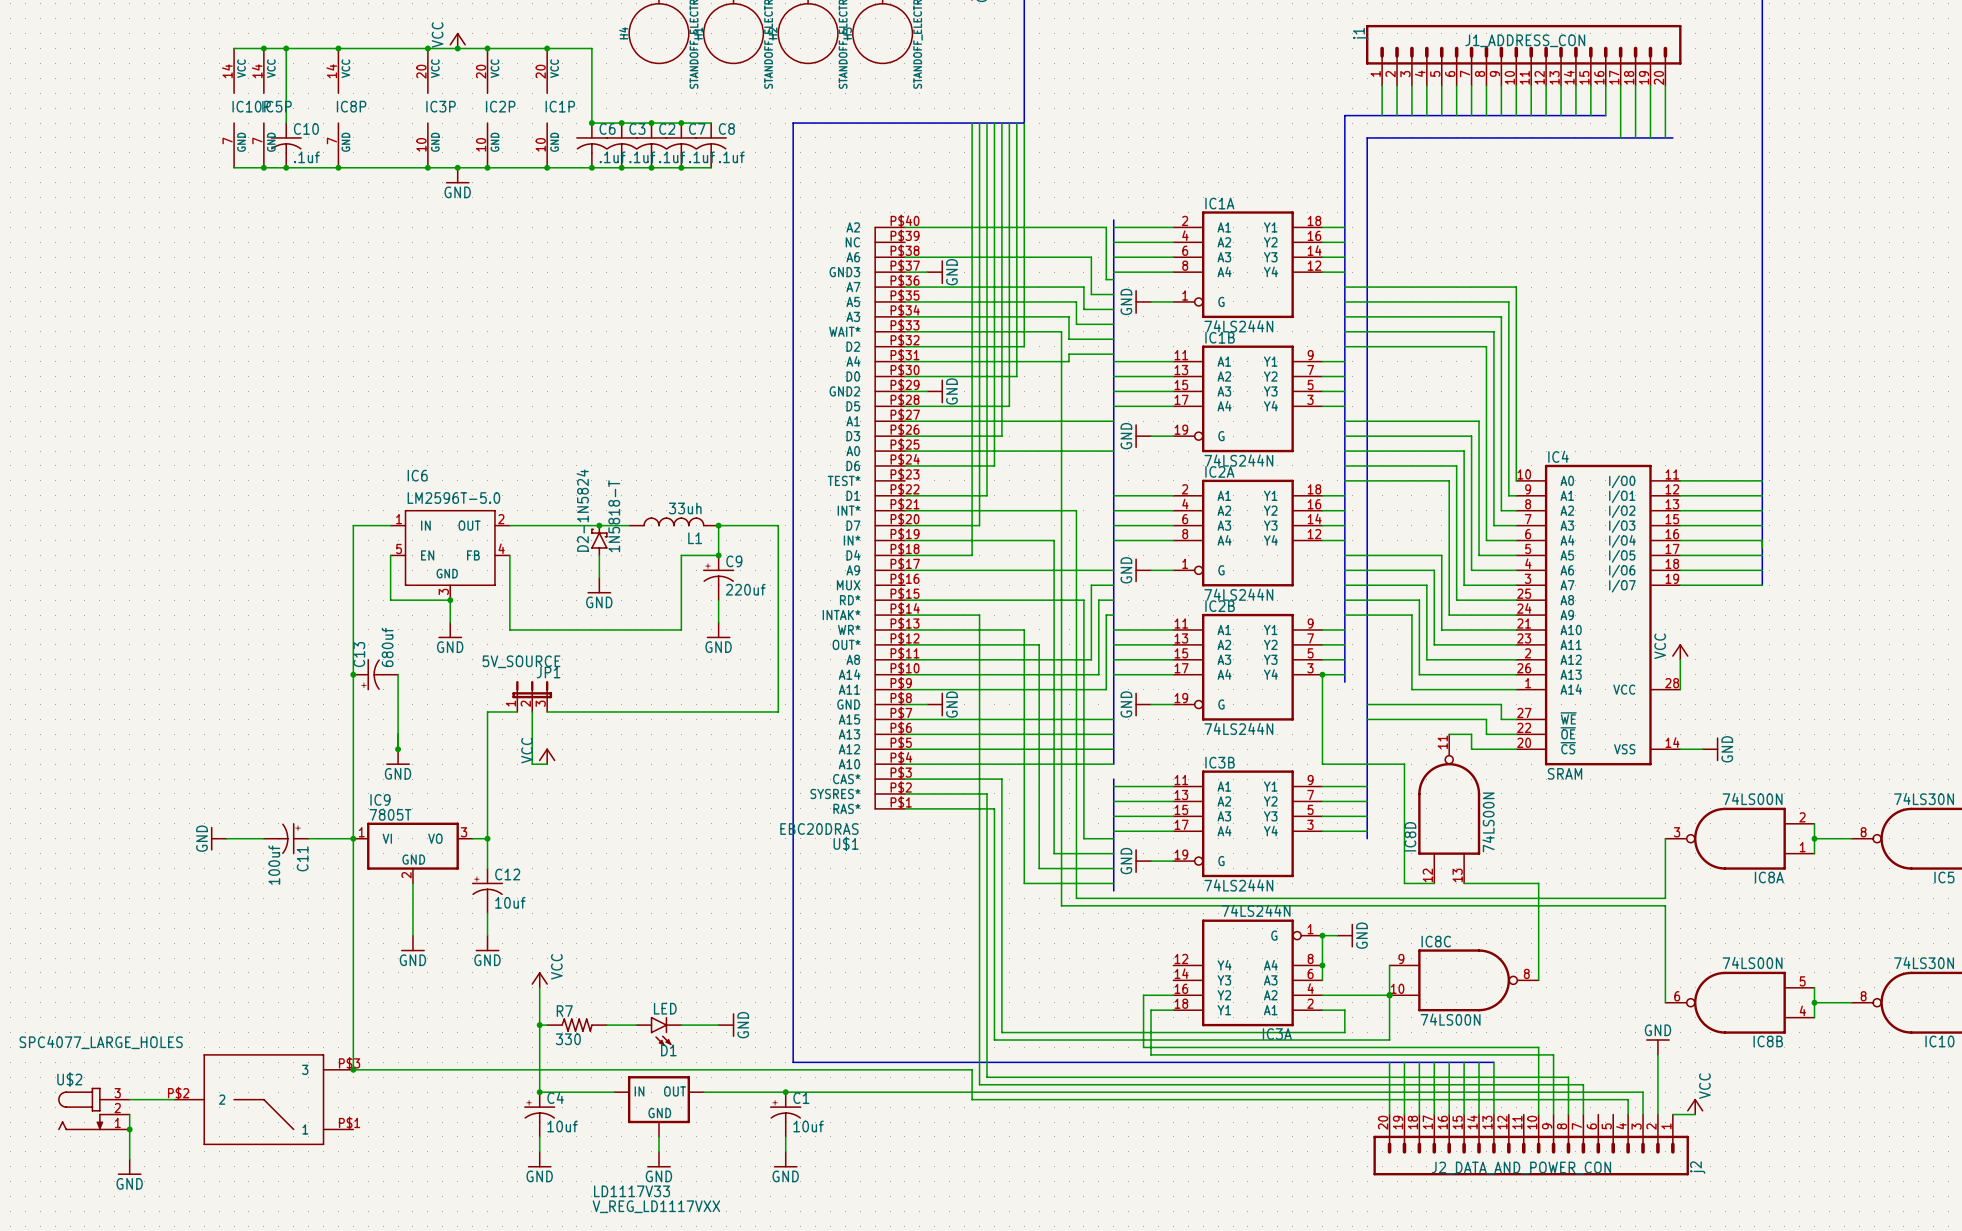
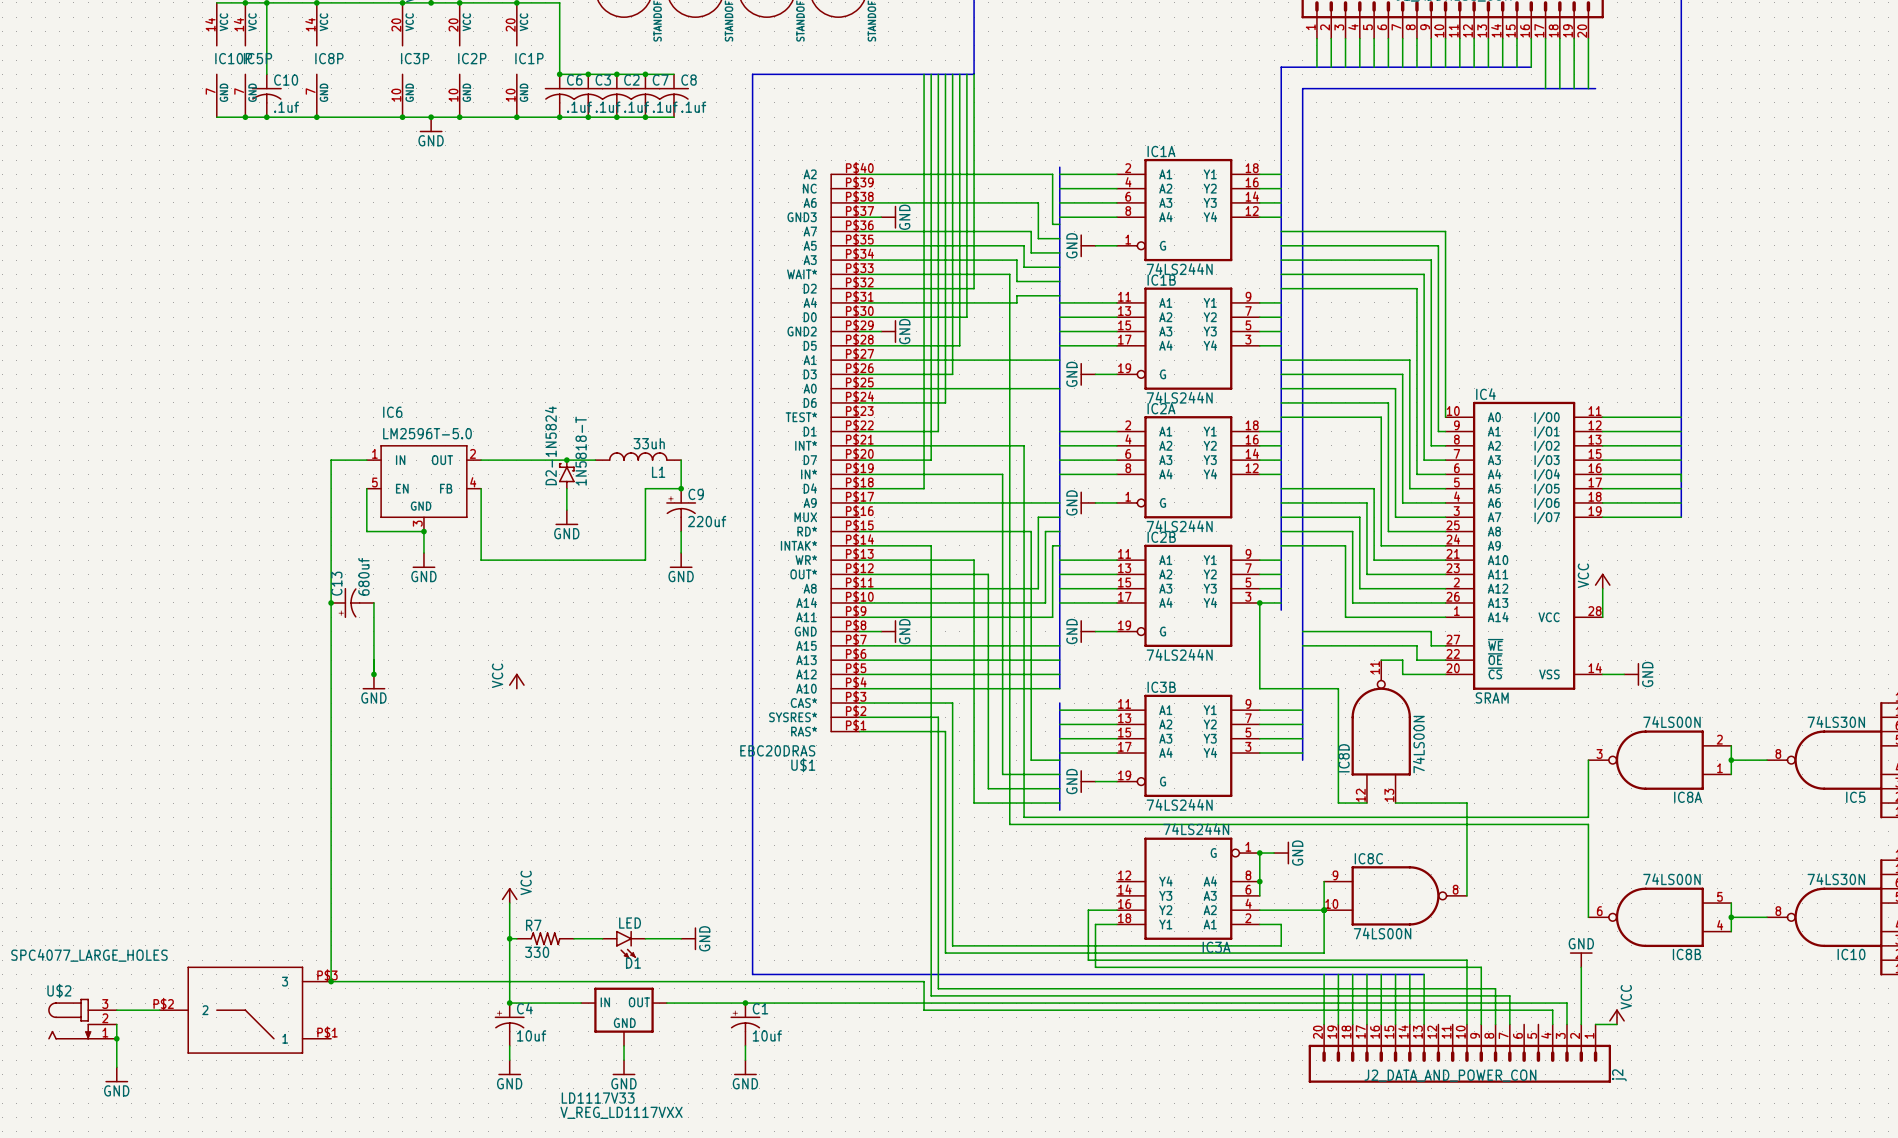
wire: (718, 525) (778, 525) (778, 711) (547, 711) -> none
junction: (718, 525) -> none
JP1: 5V_SOURCE (532, 696) -> none
wire: (517, 711) (487, 711) (487, 868) -> none
wire: (532, 711) (532, 764) (547, 764) -> none
power symbol: GND (218, 838) -> none
wire: (226, 838) (263, 838) -> none
C11: 100uf (286, 838) -> none
wire: (308, 838) (353, 838) -> none
junction: (353, 838) -> none
wire: (472, 838) (487, 838) -> none
junction: (487, 838) -> none
IC9: 7805T (412, 853) -> none
wire: (412, 883) (412, 935) -> none
C12: 10uf (487, 890) -> none
wire: (487, 913) (487, 935) -> none
power symbol: GND (412, 943) -> none
power symbol: GND (487, 943) -> none

